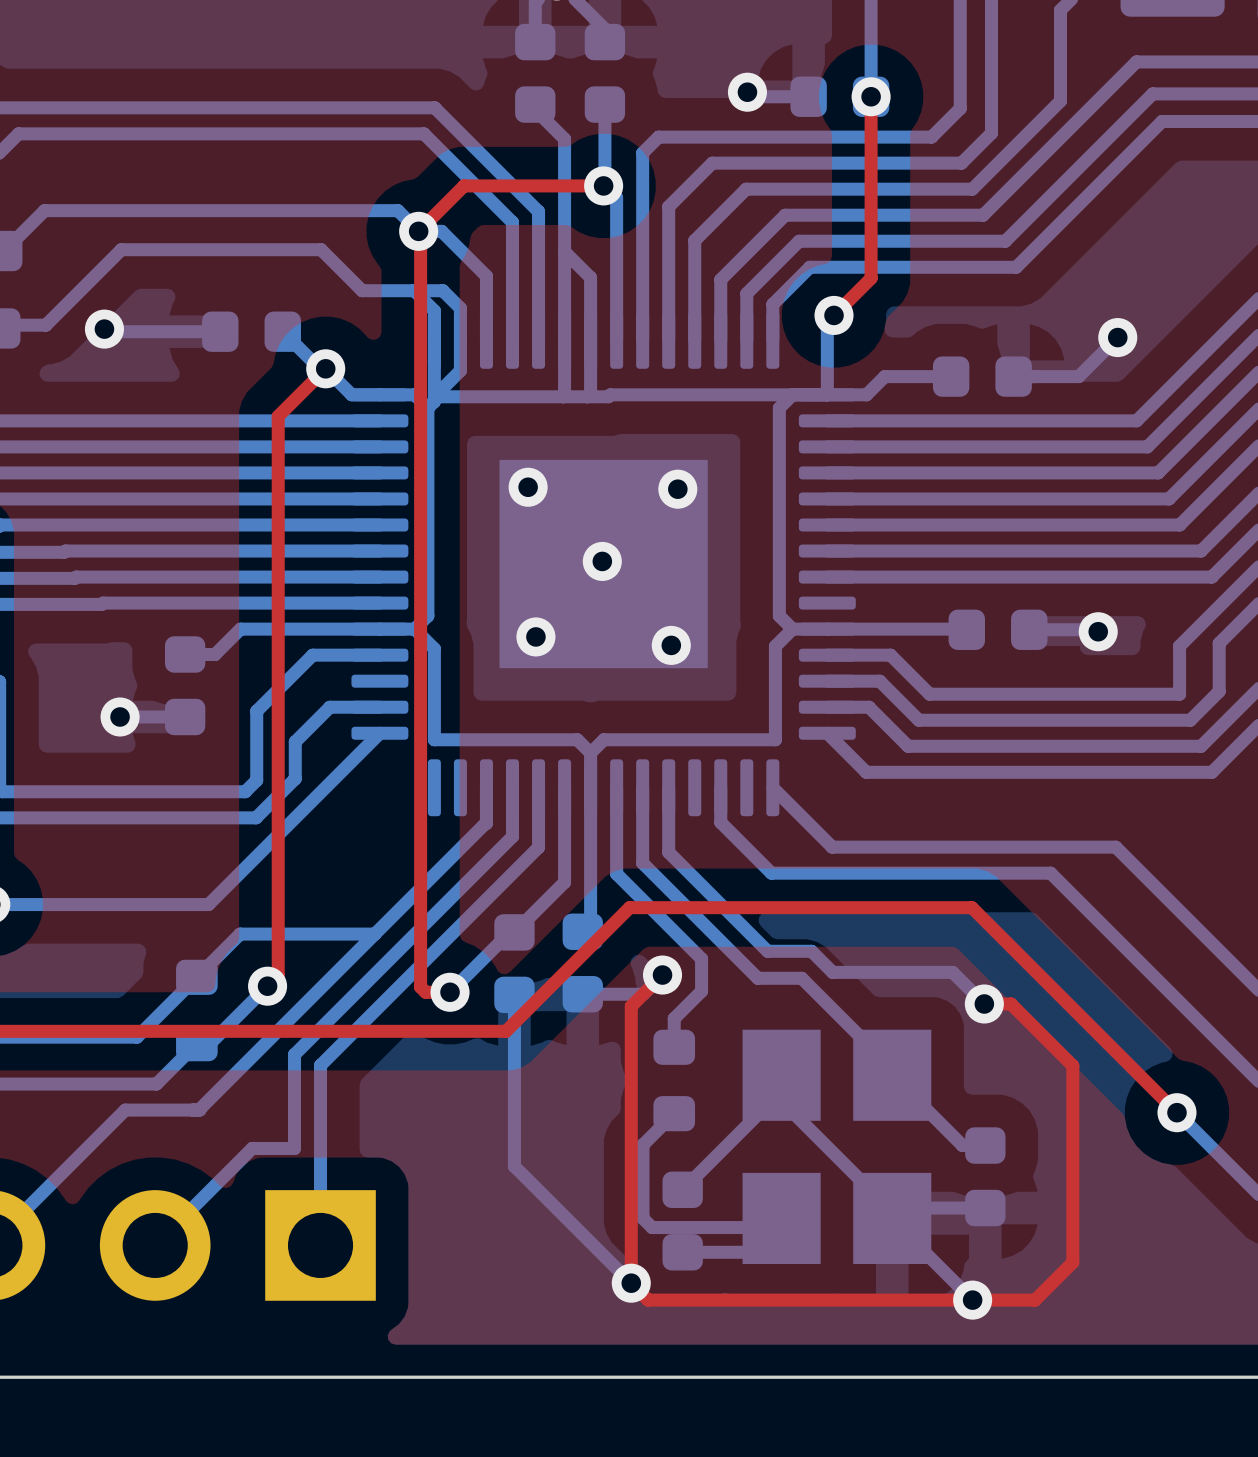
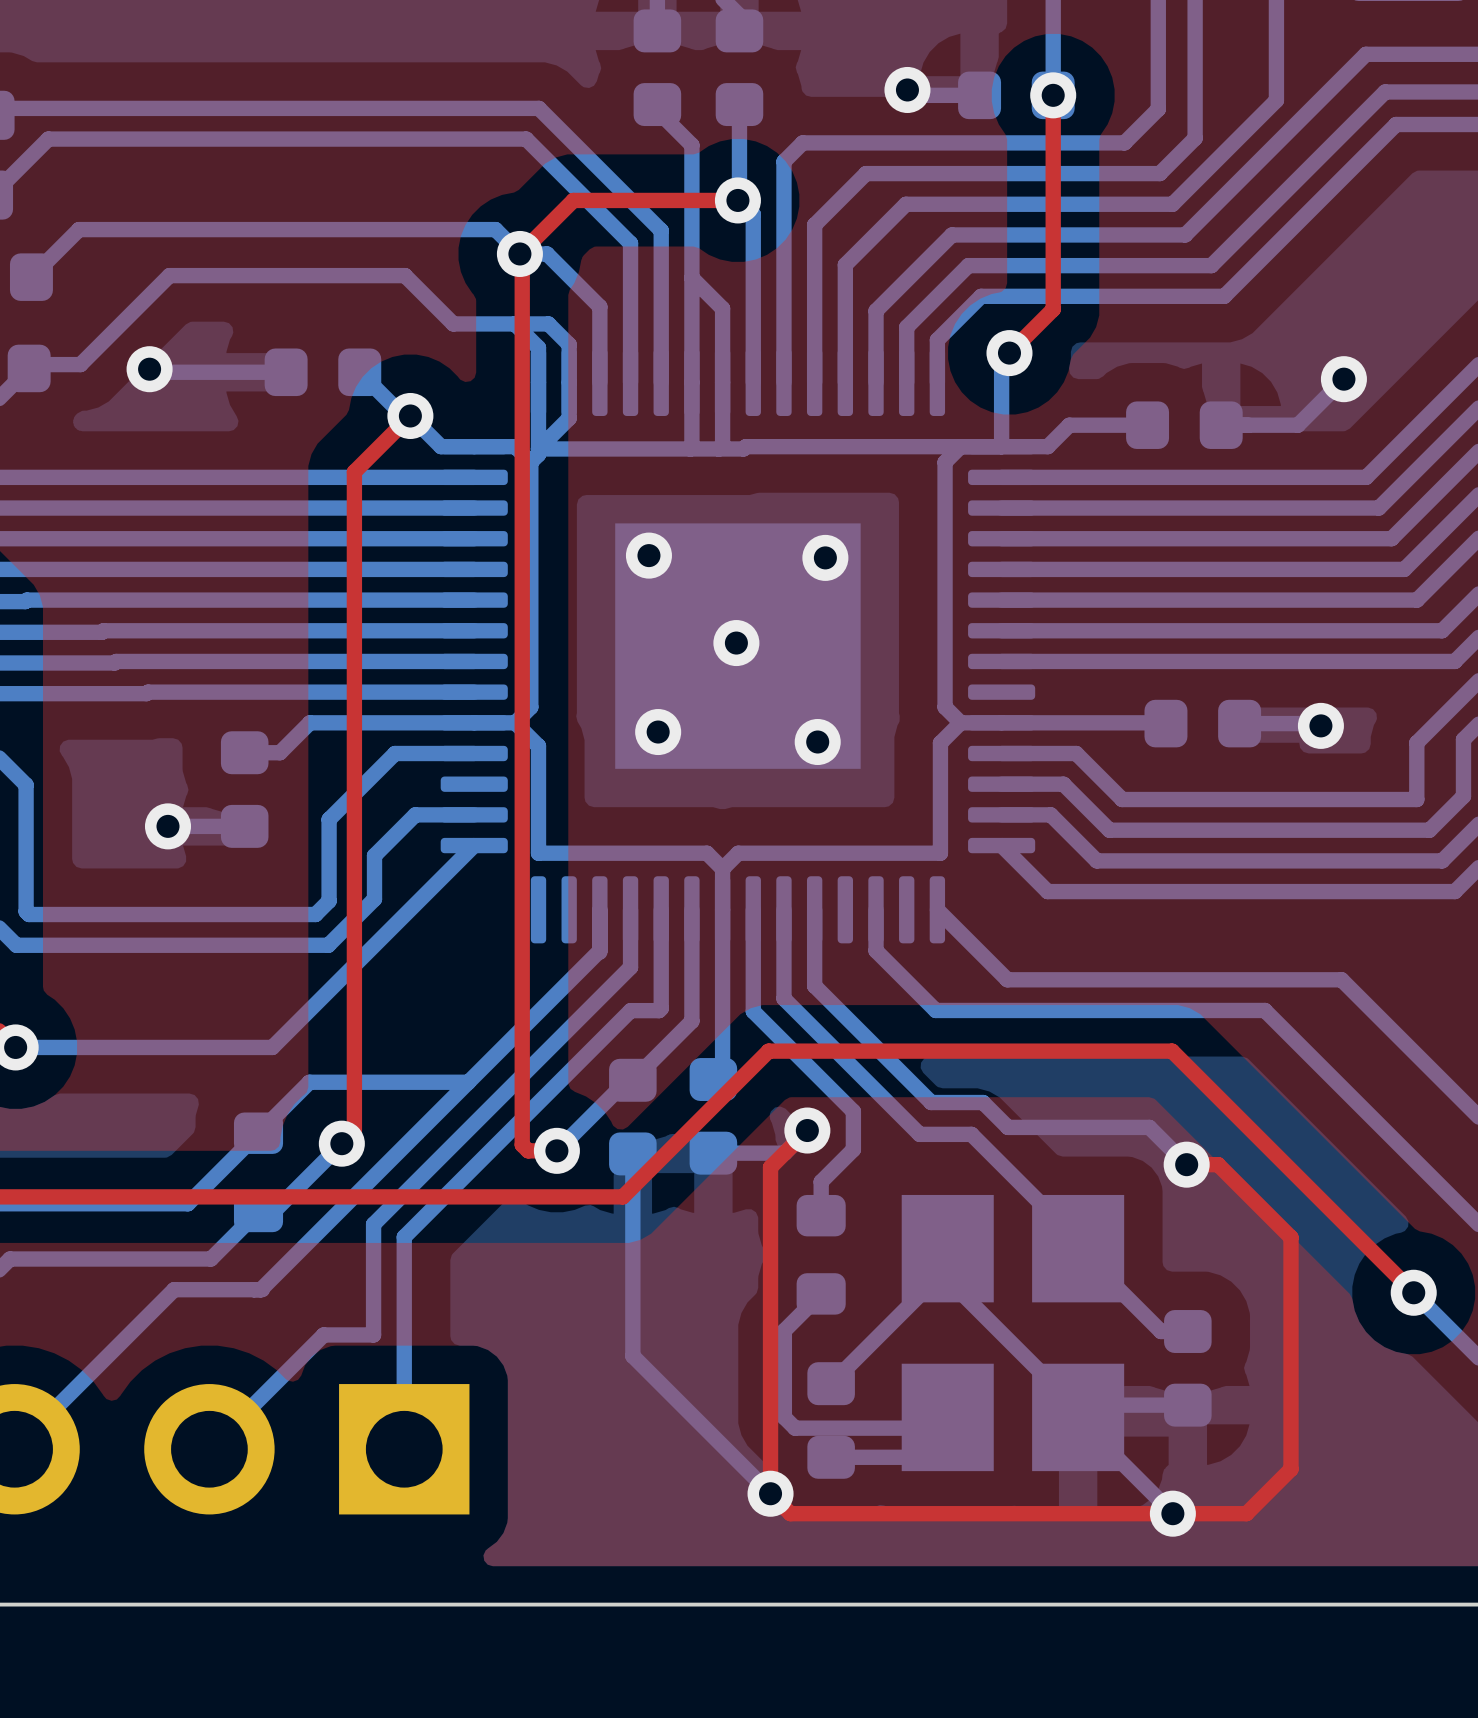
bottom track: (538, 847) (512, 873) -> (661, 980) (661, 1008) (659, 1010) (630, 1010)

